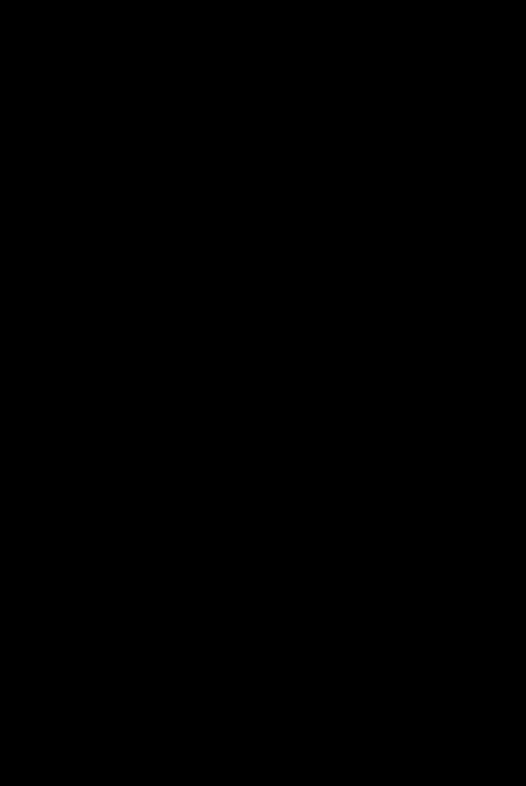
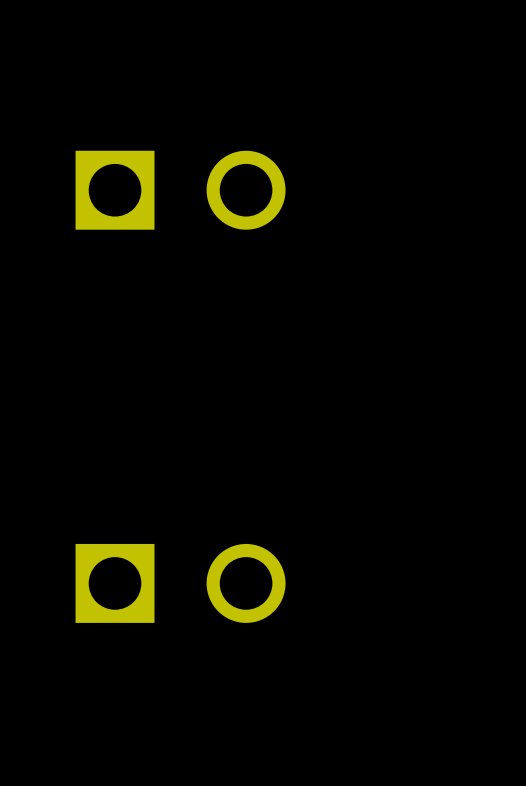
part: none -> (180, 190)
part: none -> (180, 583)

